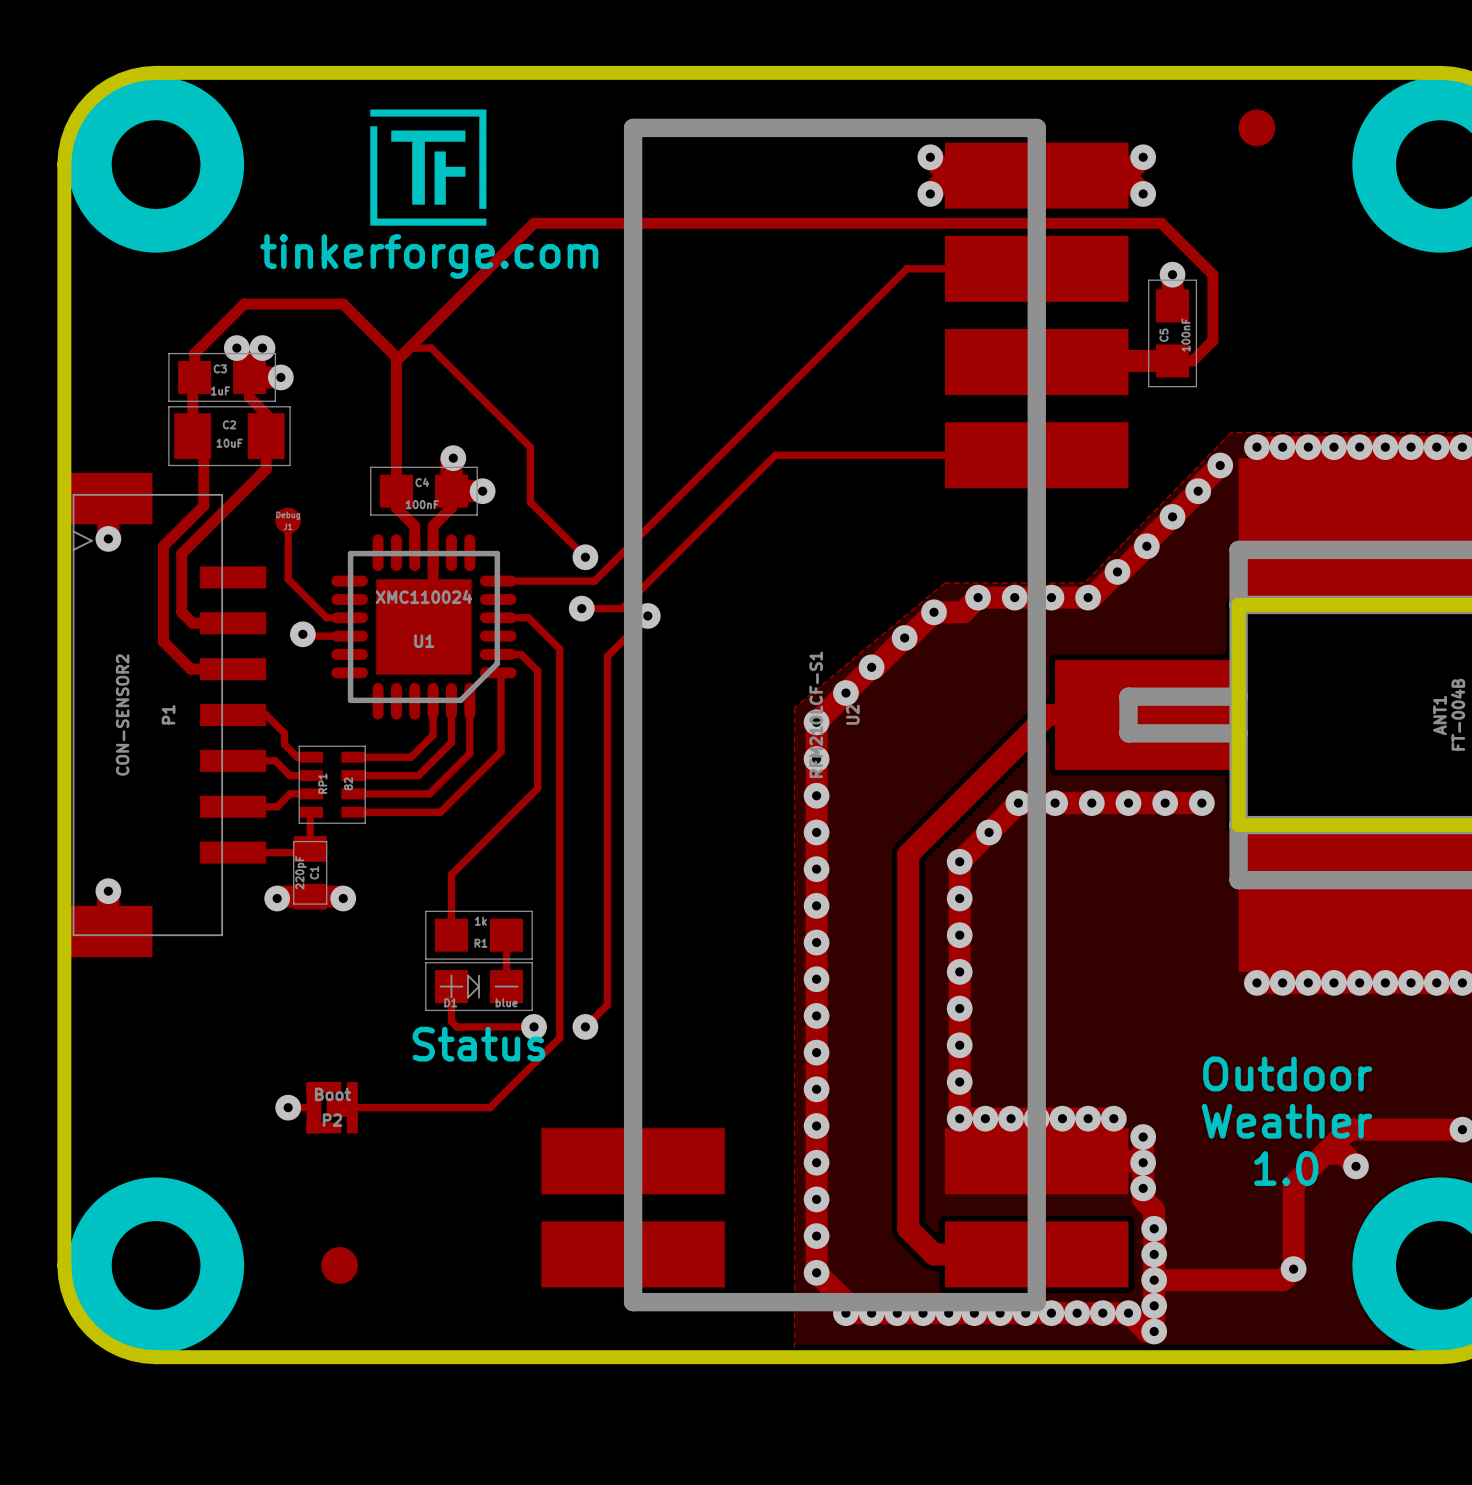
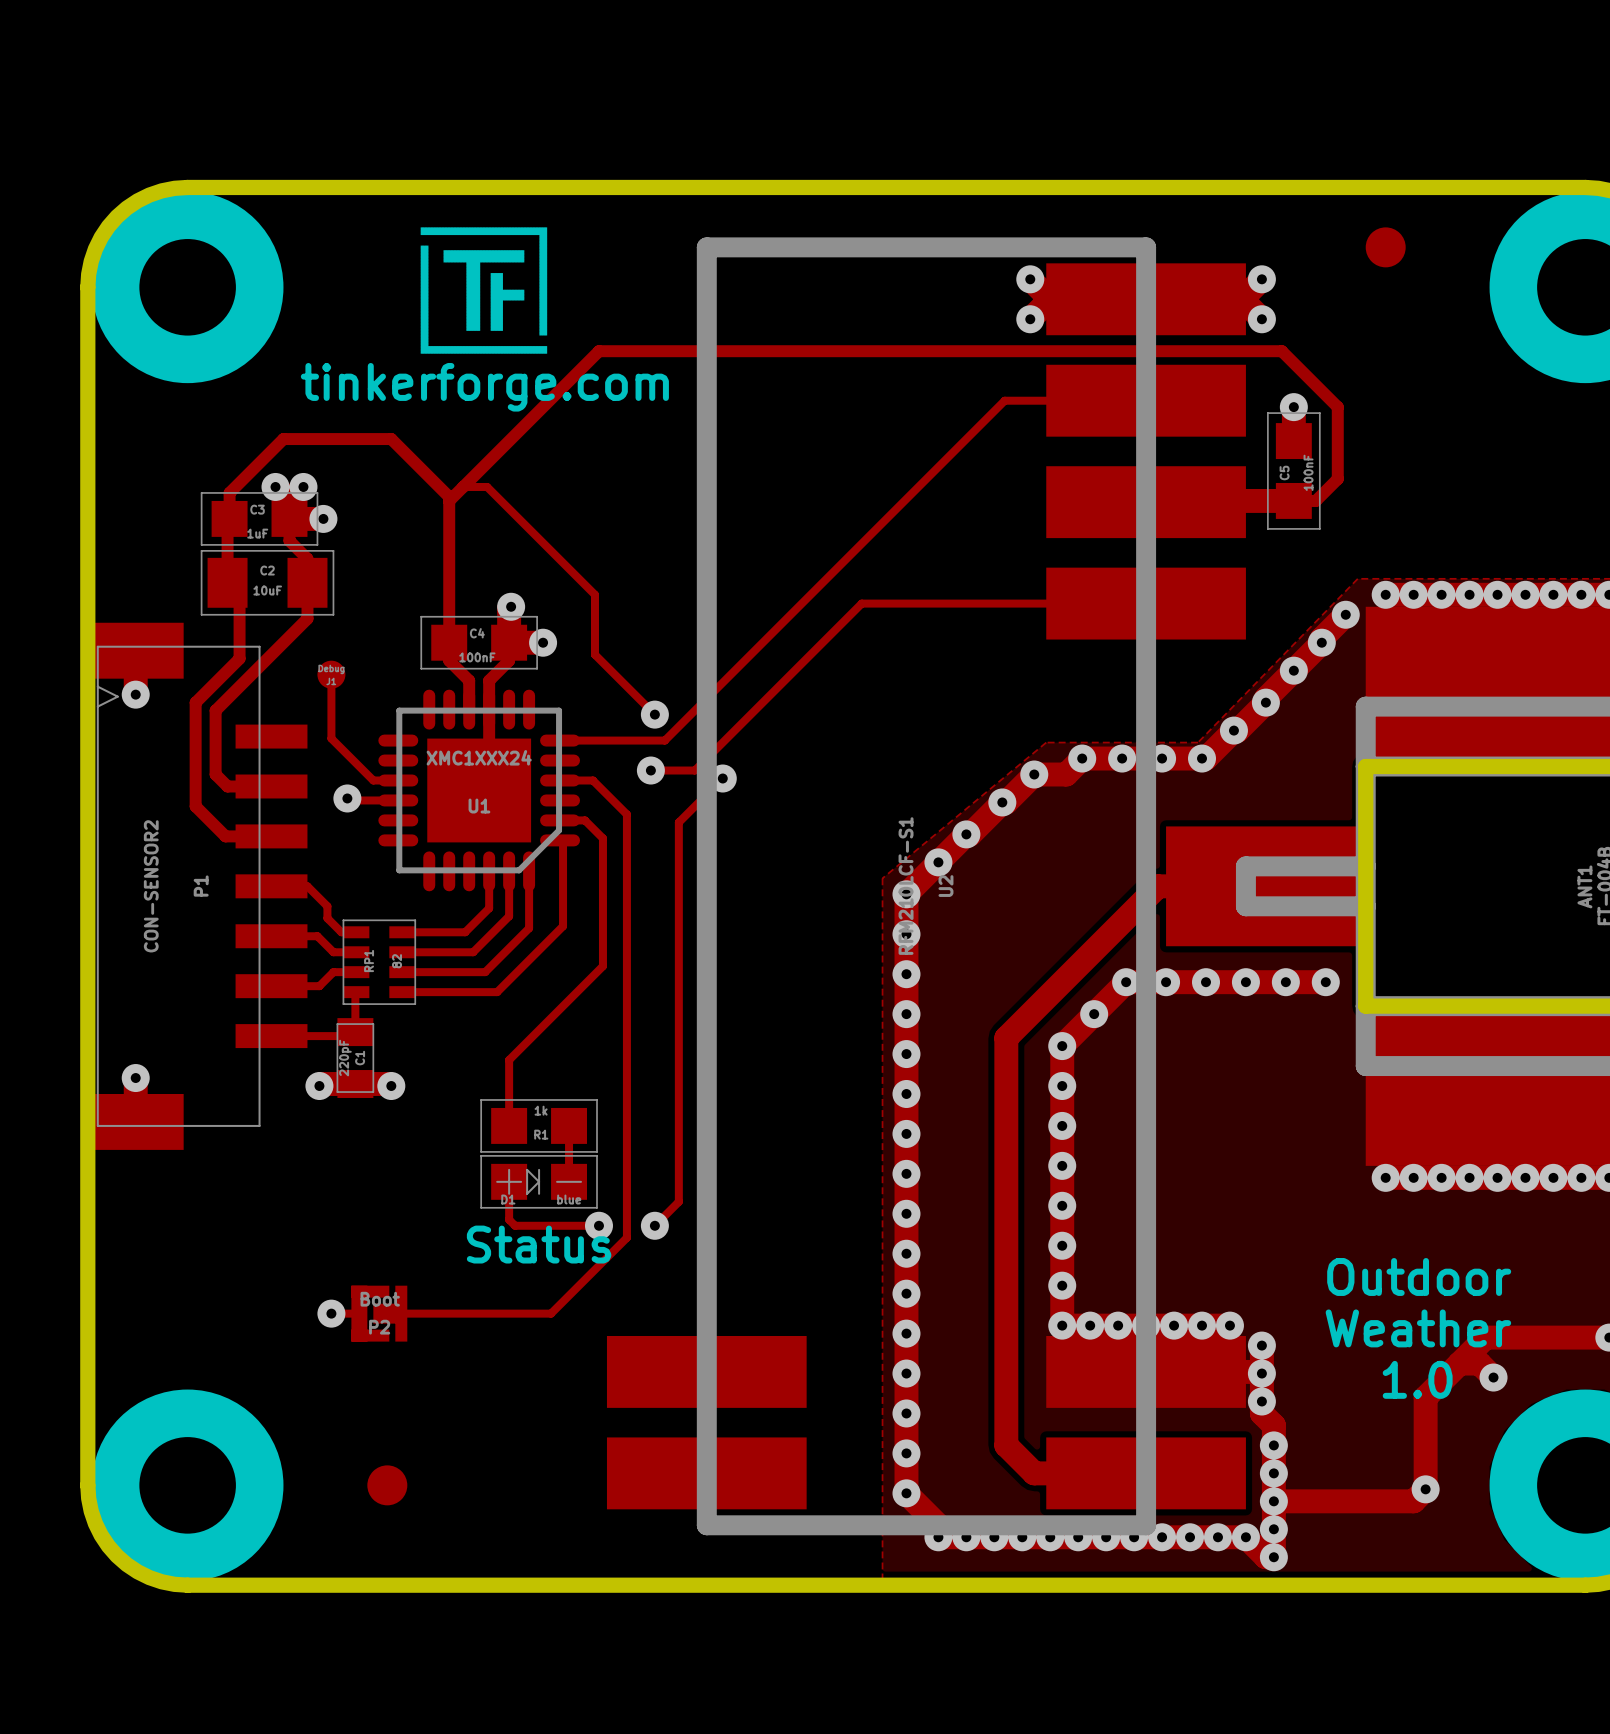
U1 value: XMC110024 (423, 596) -> XMC1XXX24 (479, 757)

